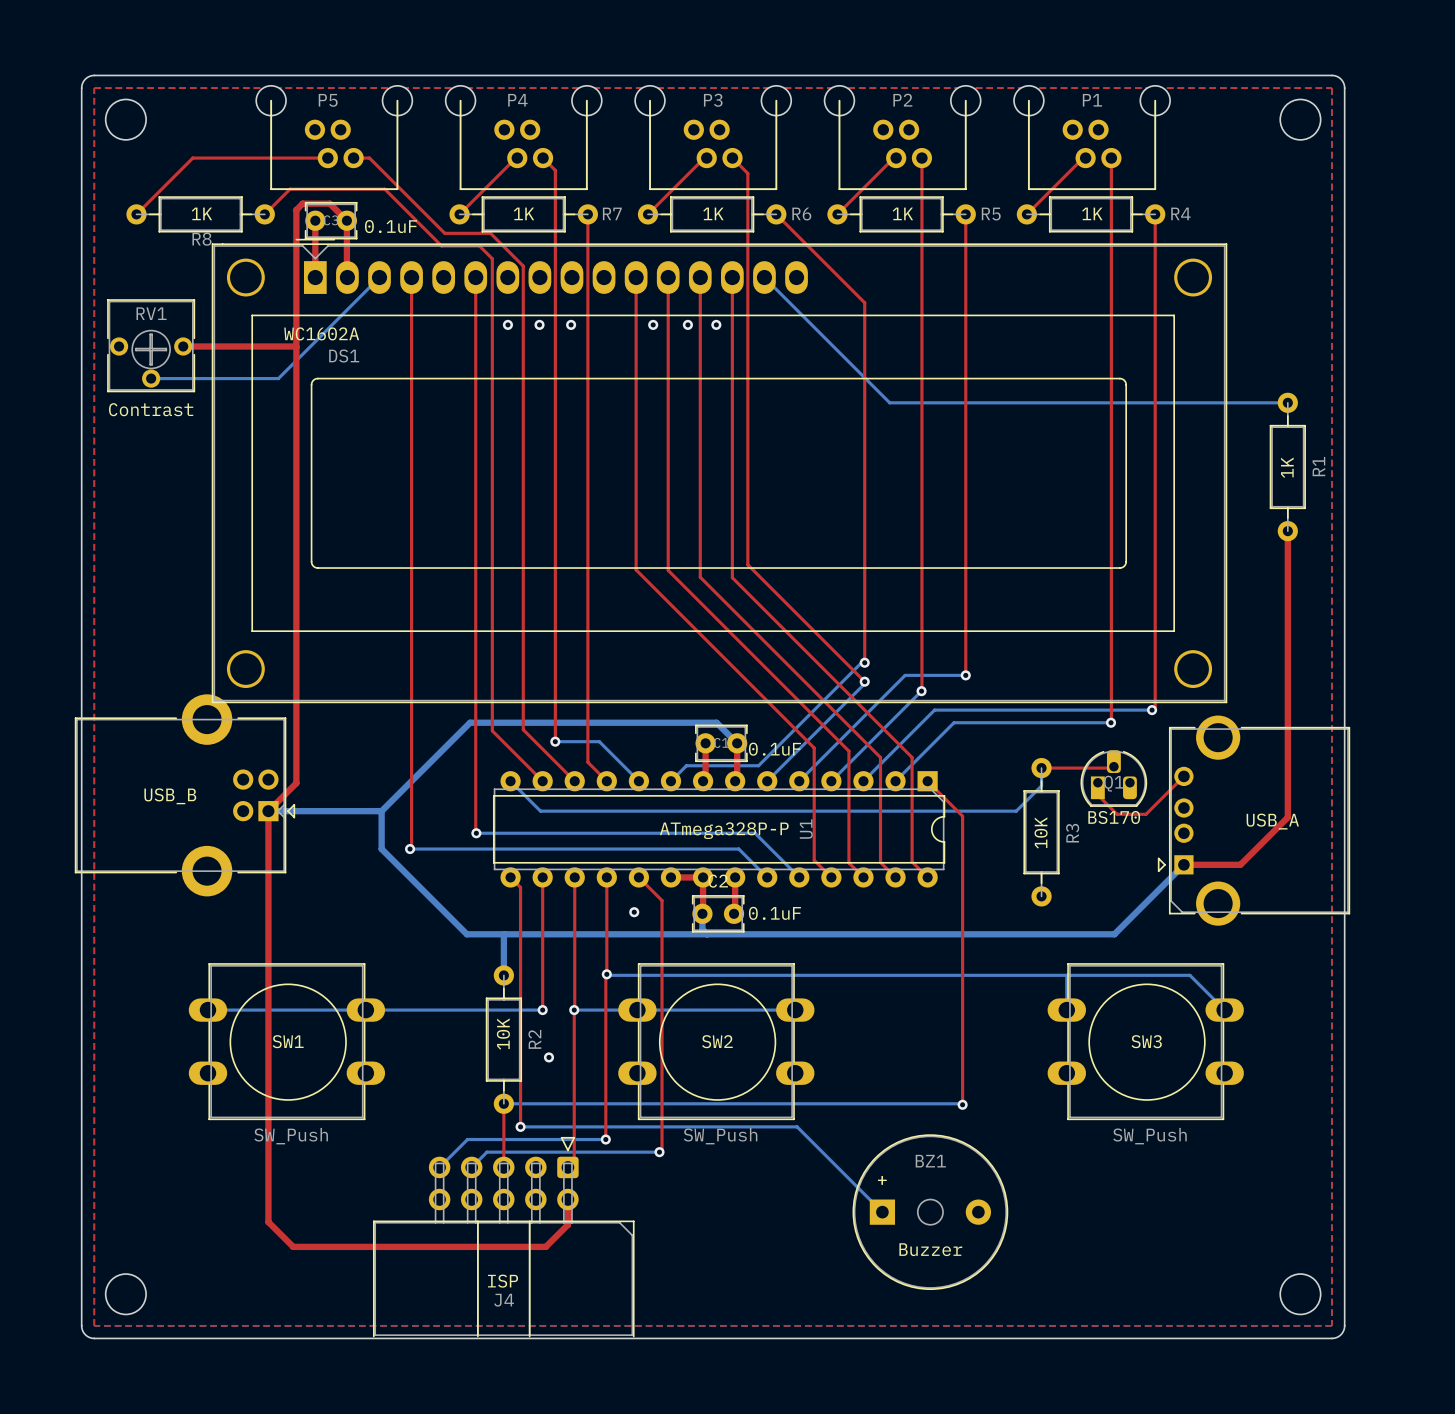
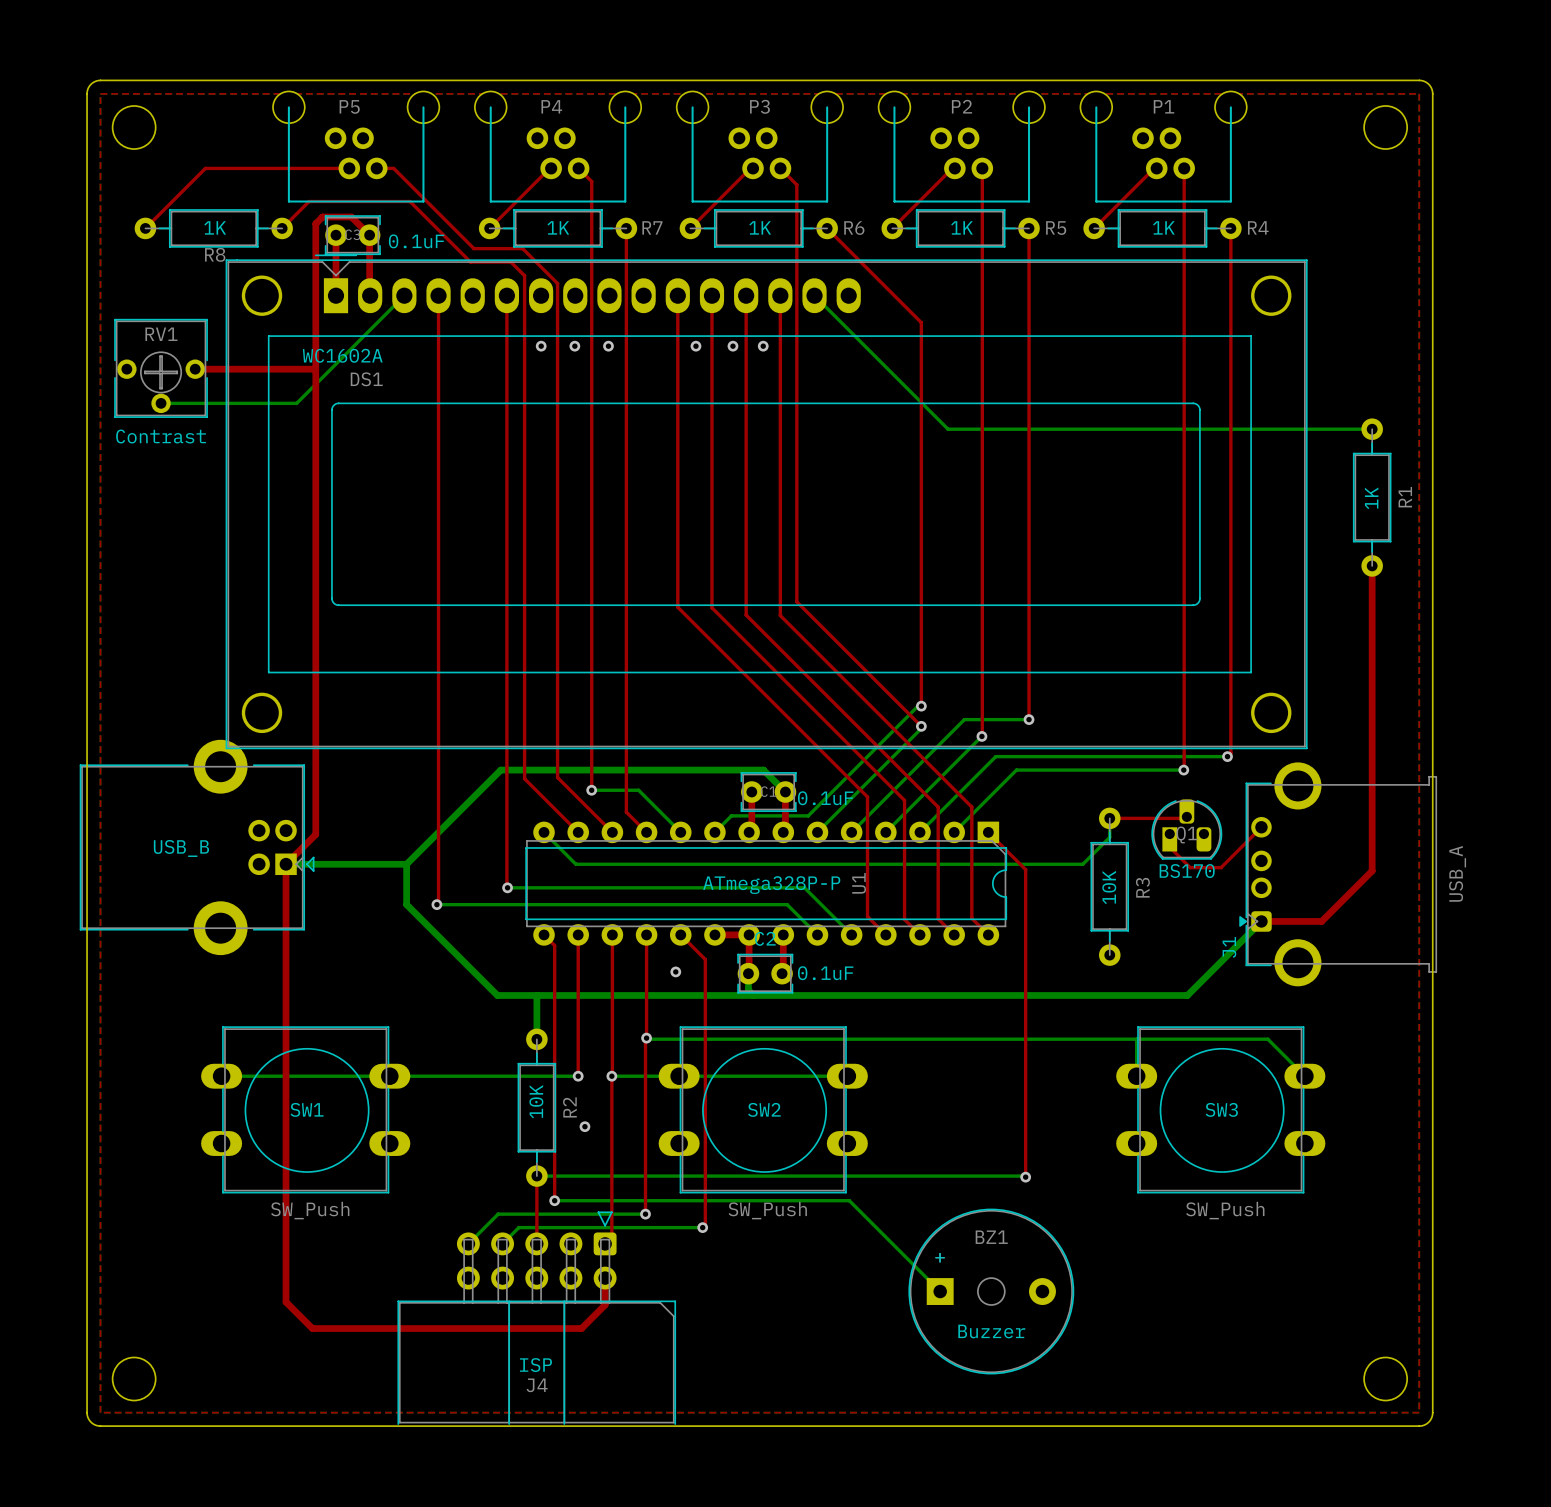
part: USB_A (1254, 820) -> none
J1: none -> USB_A (1338, 874)

